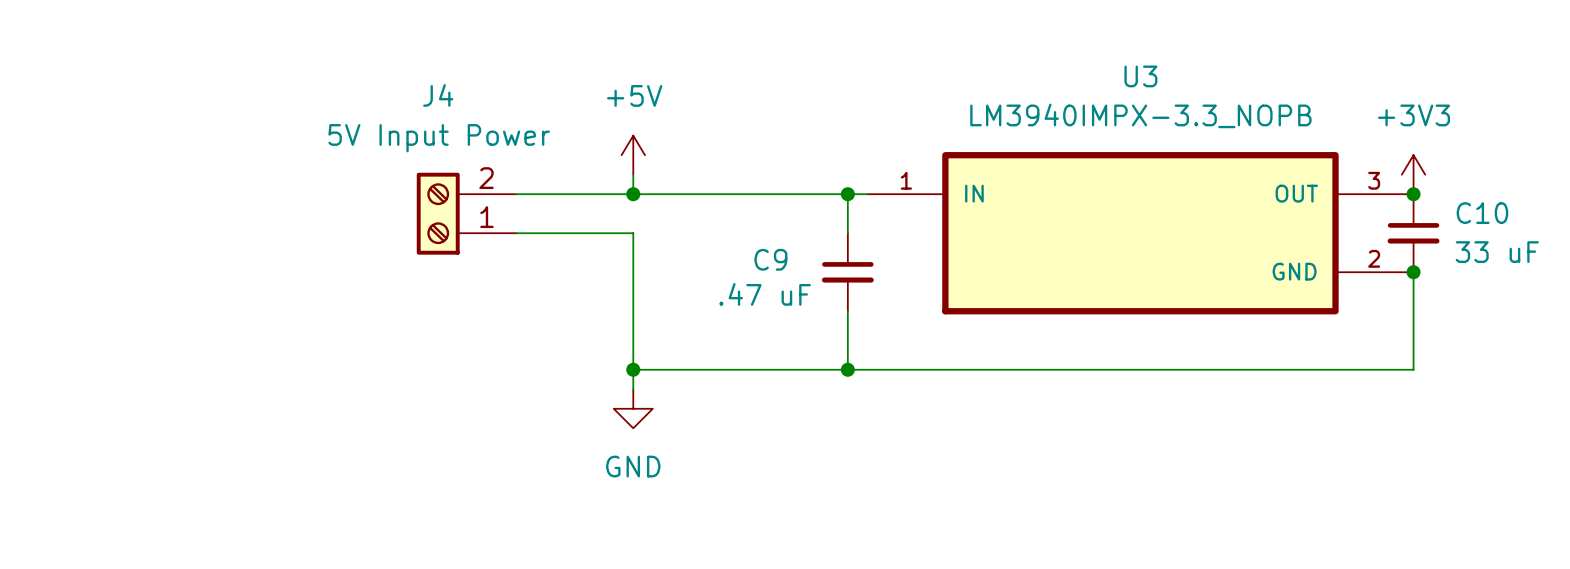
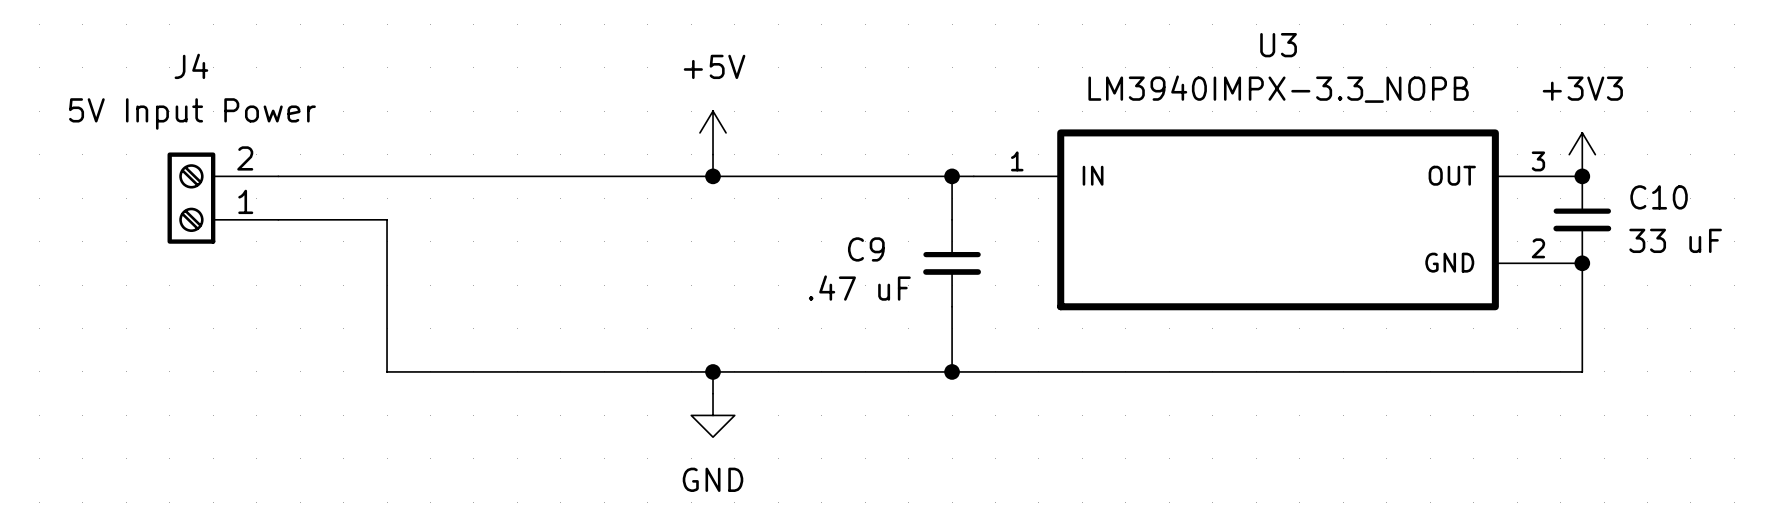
wire: none -> (278, 176) (582, 176)
J4 position: (466, 213) -> (222, 198)
wire: (516, 233) (633, 233) (633, 369) -> (278, 219) (387, 219) (387, 371) (713, 371)

